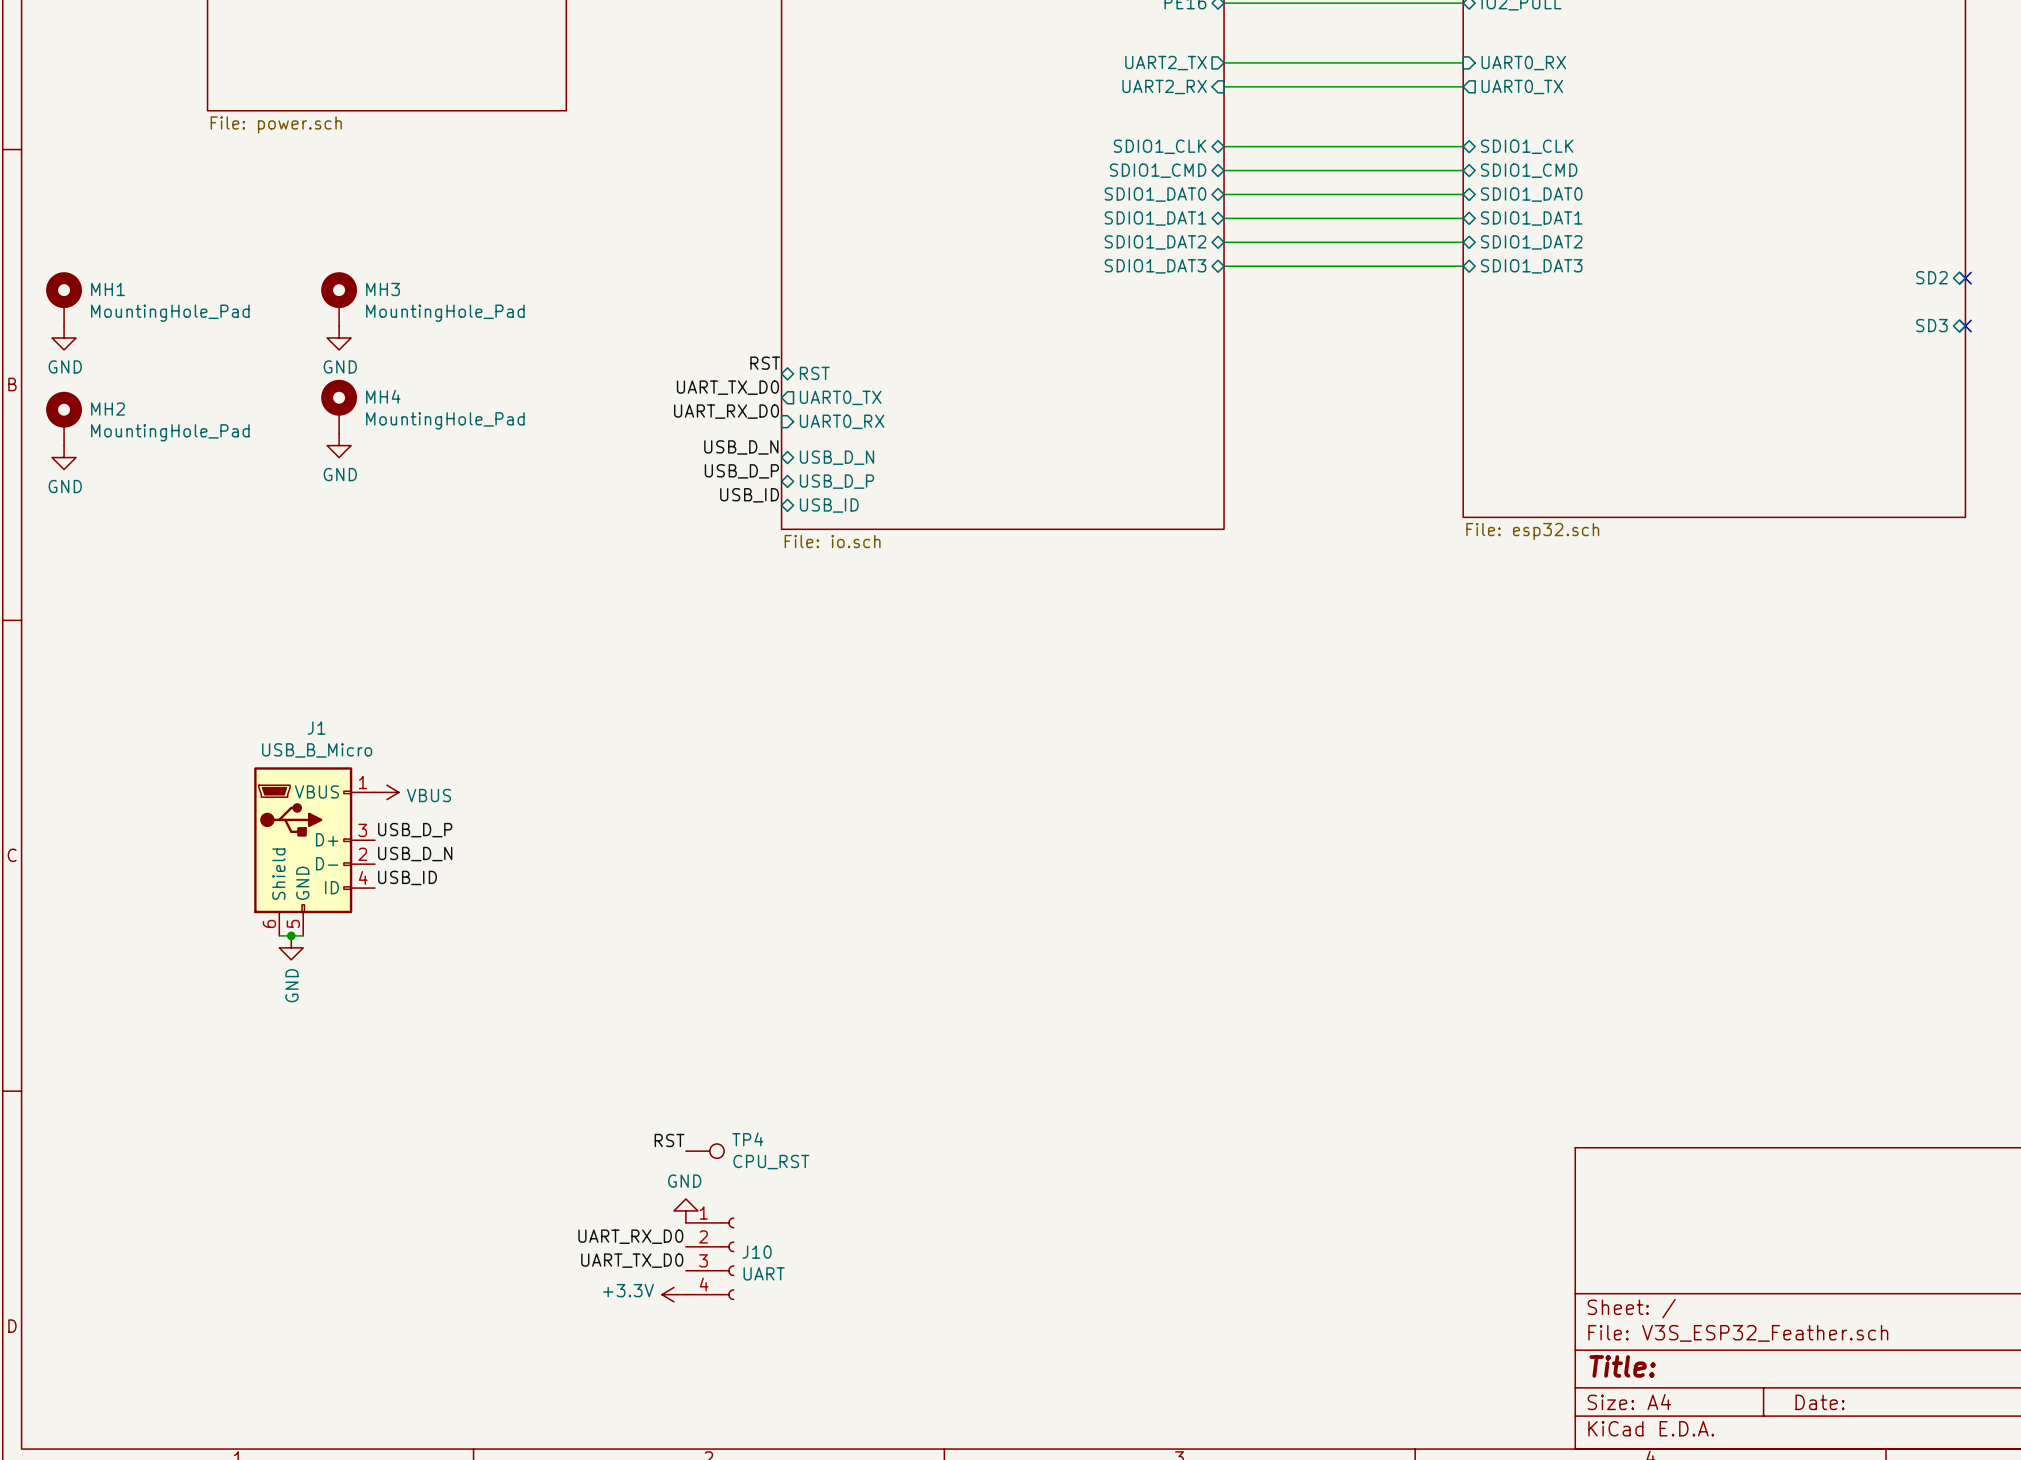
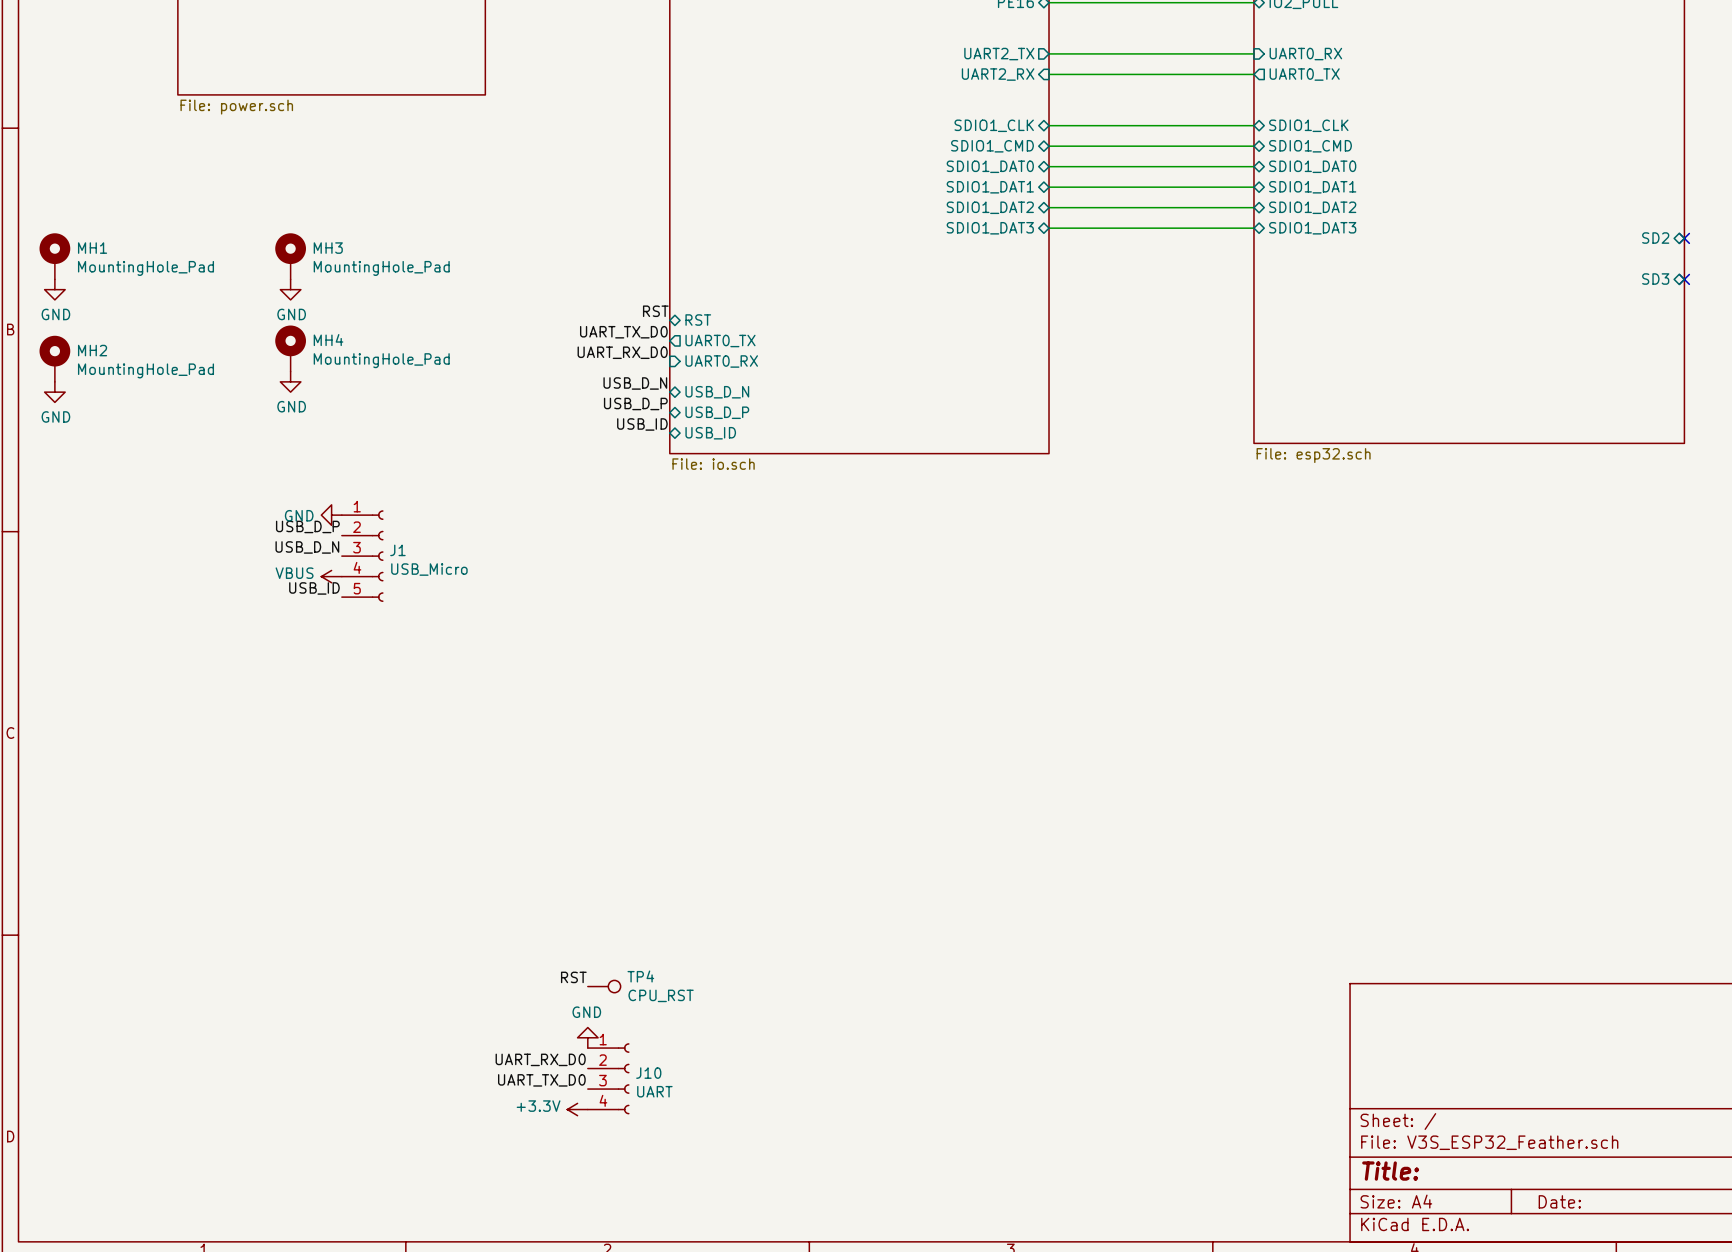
power symbol: none -> GND (331, 515)
J1 name position: J1 (316, 728) -> J1 (397, 550)
J1 value: USB_B_Micro (317, 750) -> USB_Micro (429, 569)
J1 symbol: [254, 767, 375, 936] -> [341, 510, 384, 602]
power symbol rotation: 0° (386, 792) -> 180° (331, 576)
power symbol position: VBUS (386, 792) -> VBUS (331, 576)
label position: USB_D_P (415, 830) -> USB_D_P (307, 526)
label position: USB_D_N (415, 854) -> USB_D_N (307, 547)
label position: USB_ID (407, 877) -> USB_ID (314, 588)
wire: (279, 935) (303, 935) -> none
junction: (291, 935) -> none
power symbol: GND (291, 947) -> none

